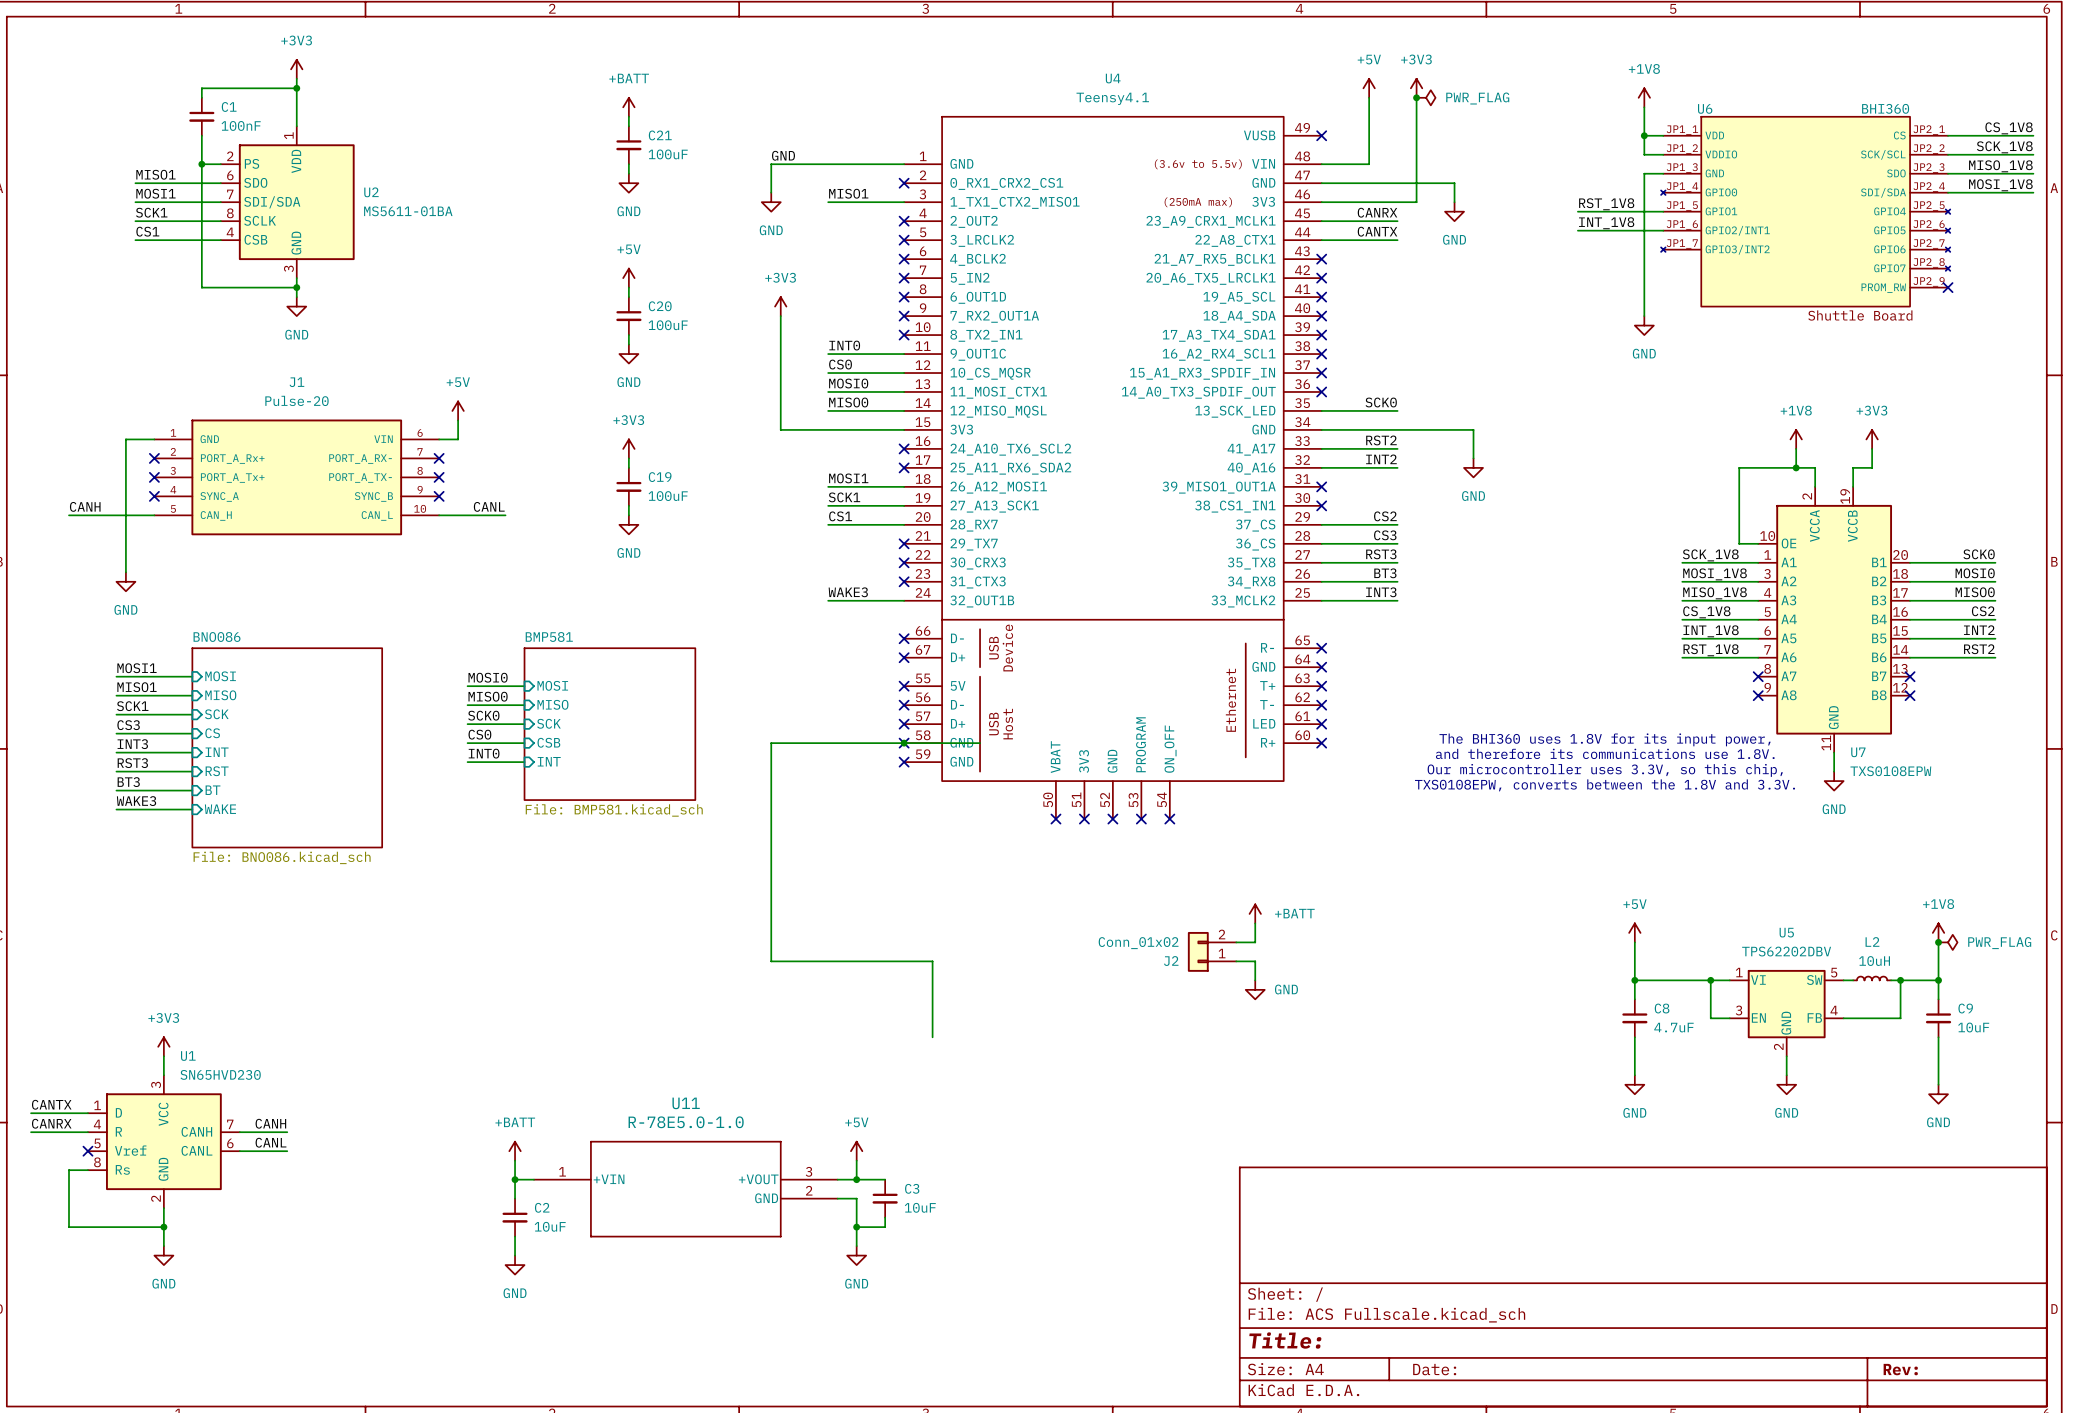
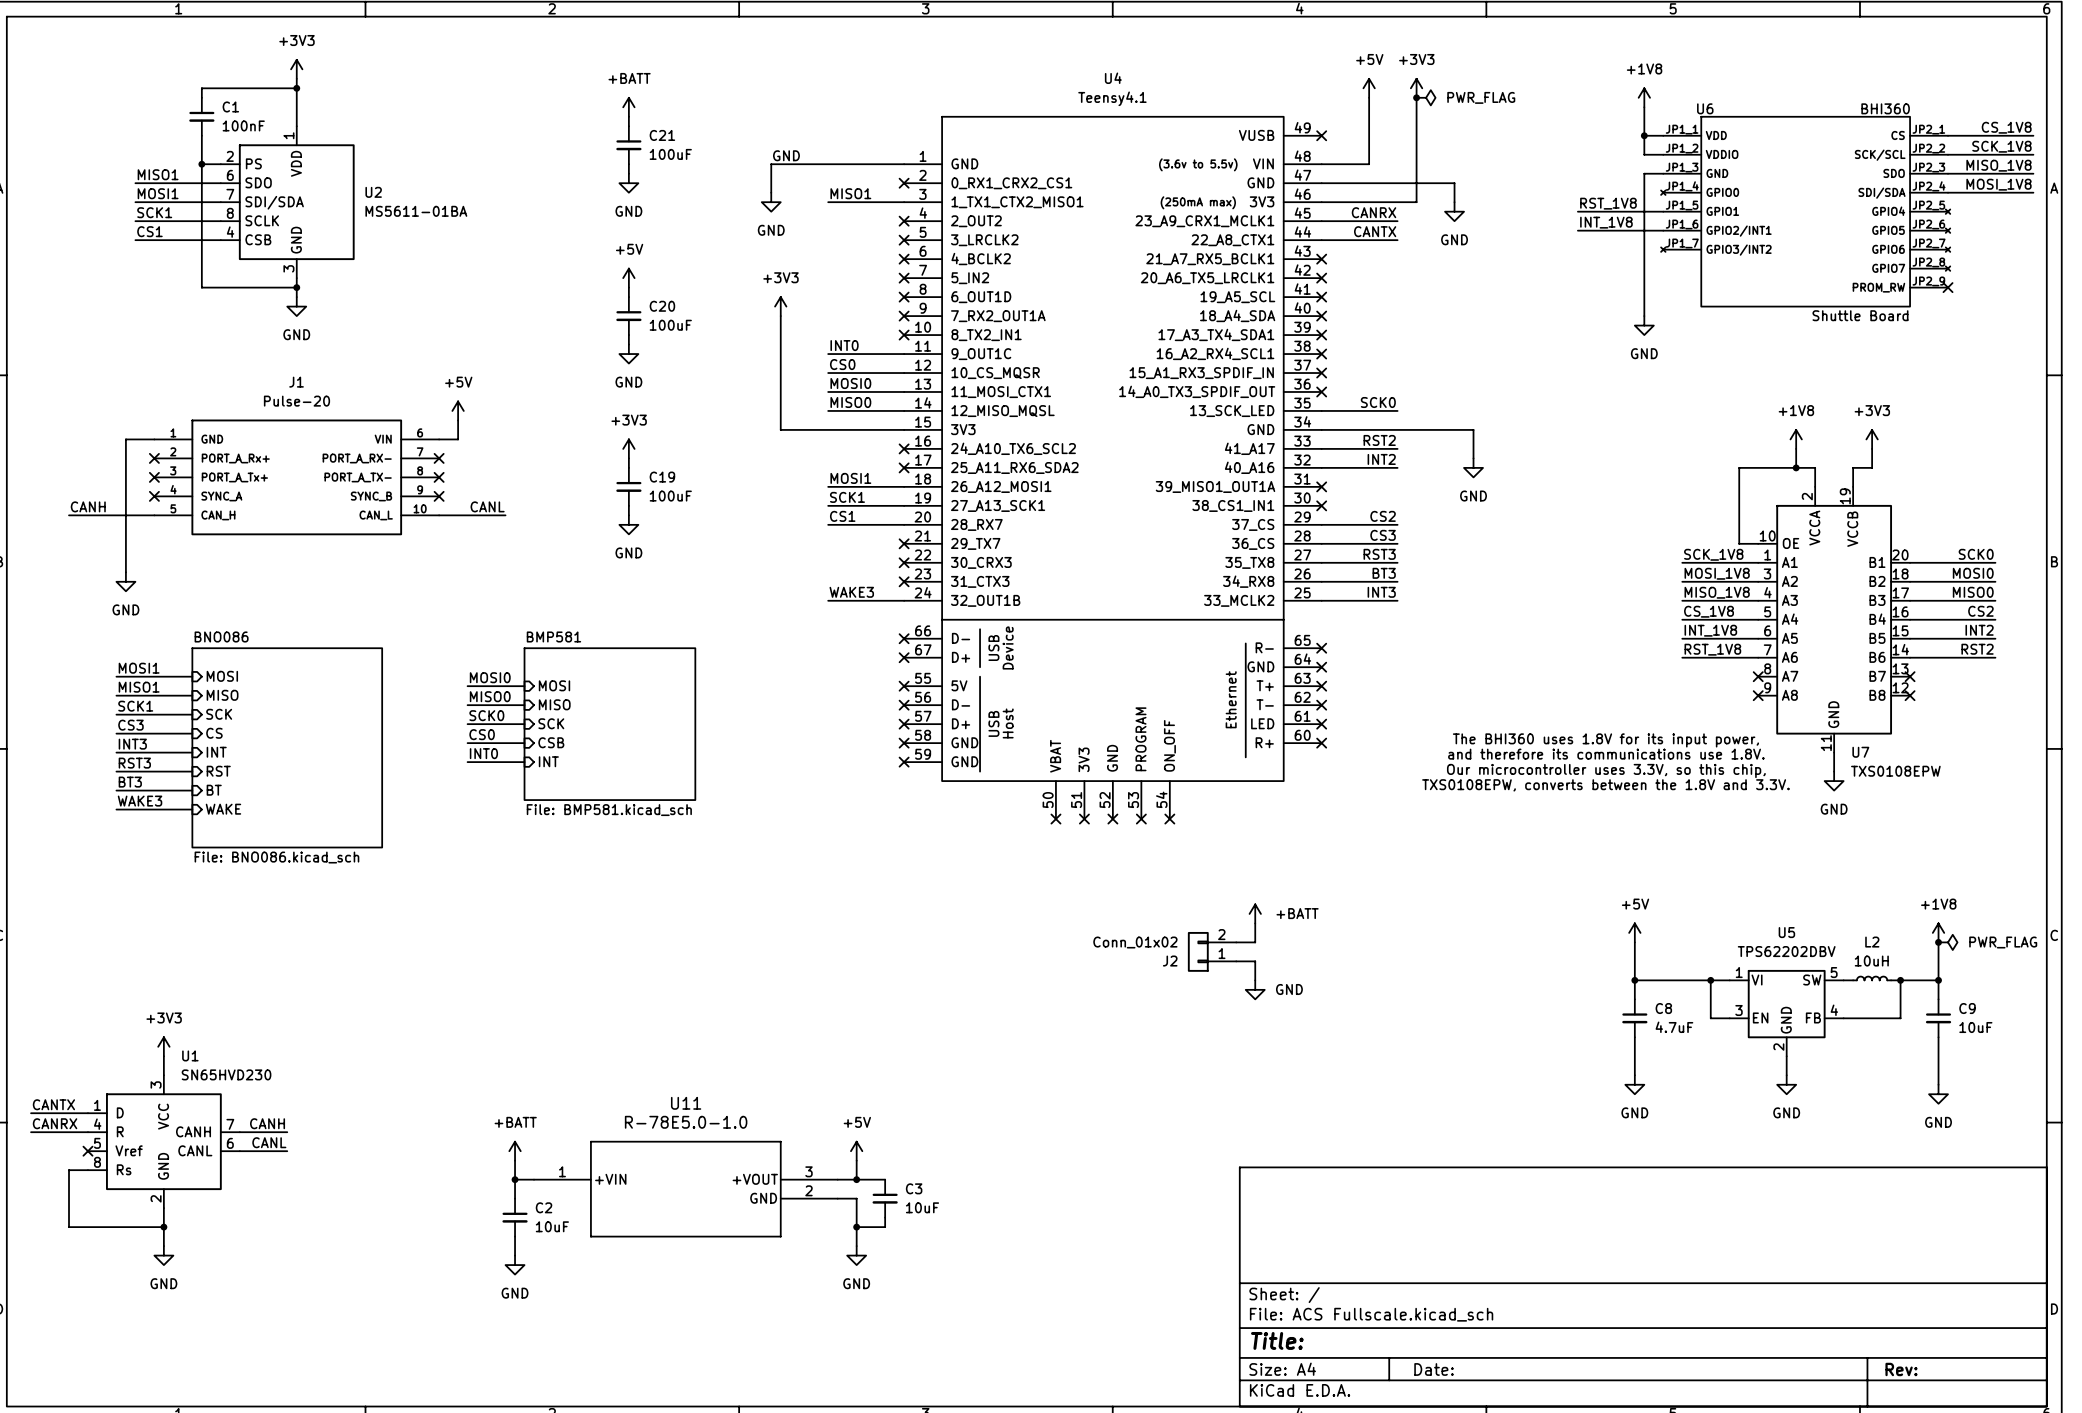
junction: (904, 743) -> none
wire: (980, 743) (771, 743) (771, 961) (932, 961) (932, 1037) -> none

